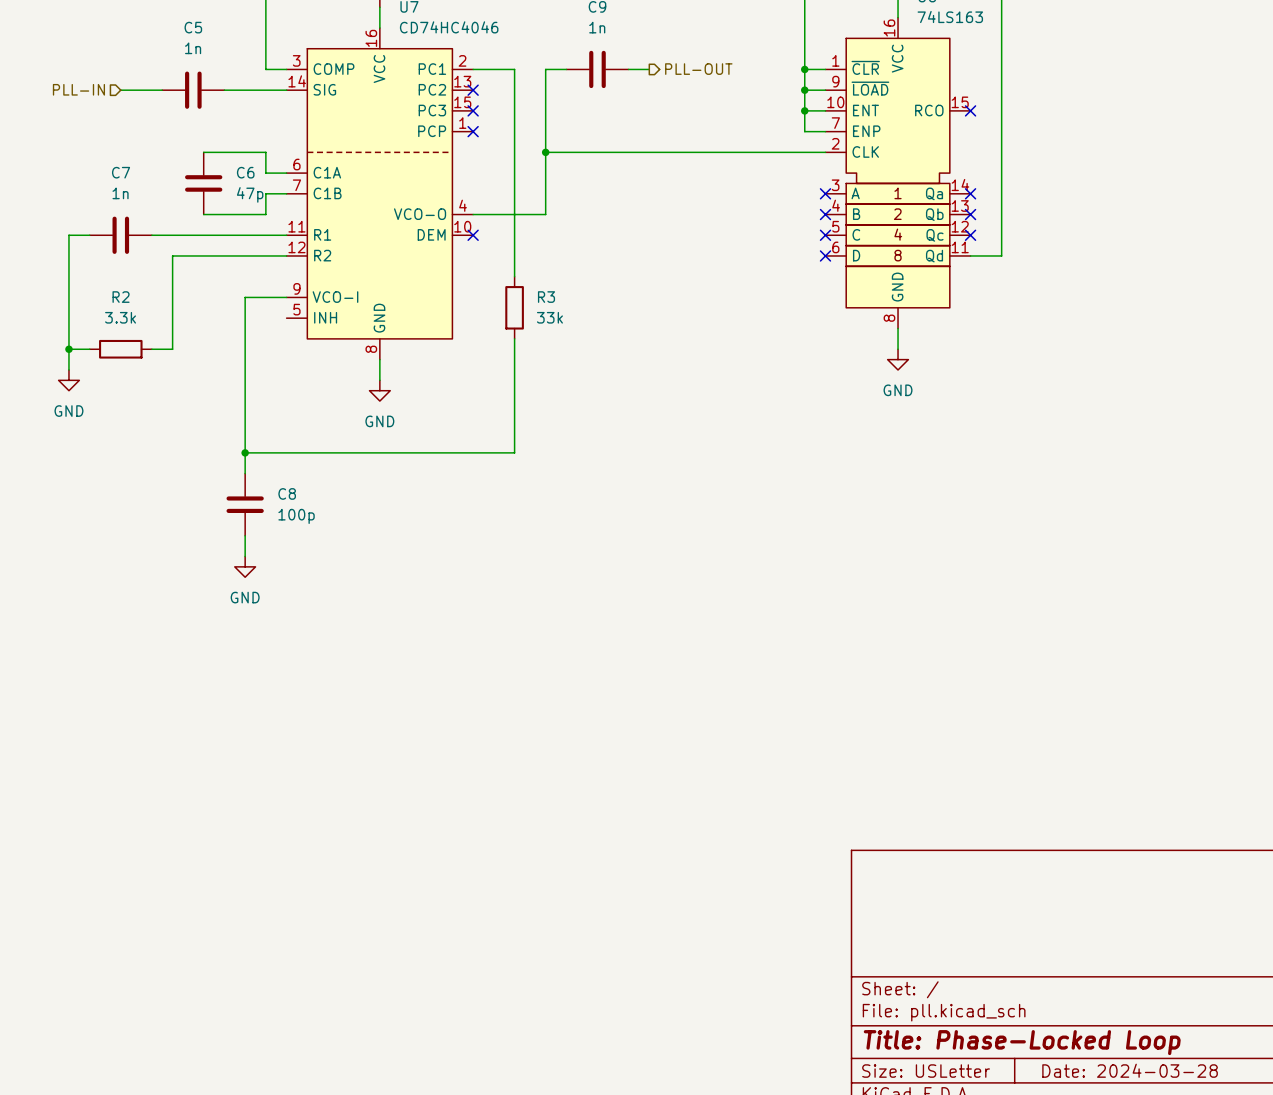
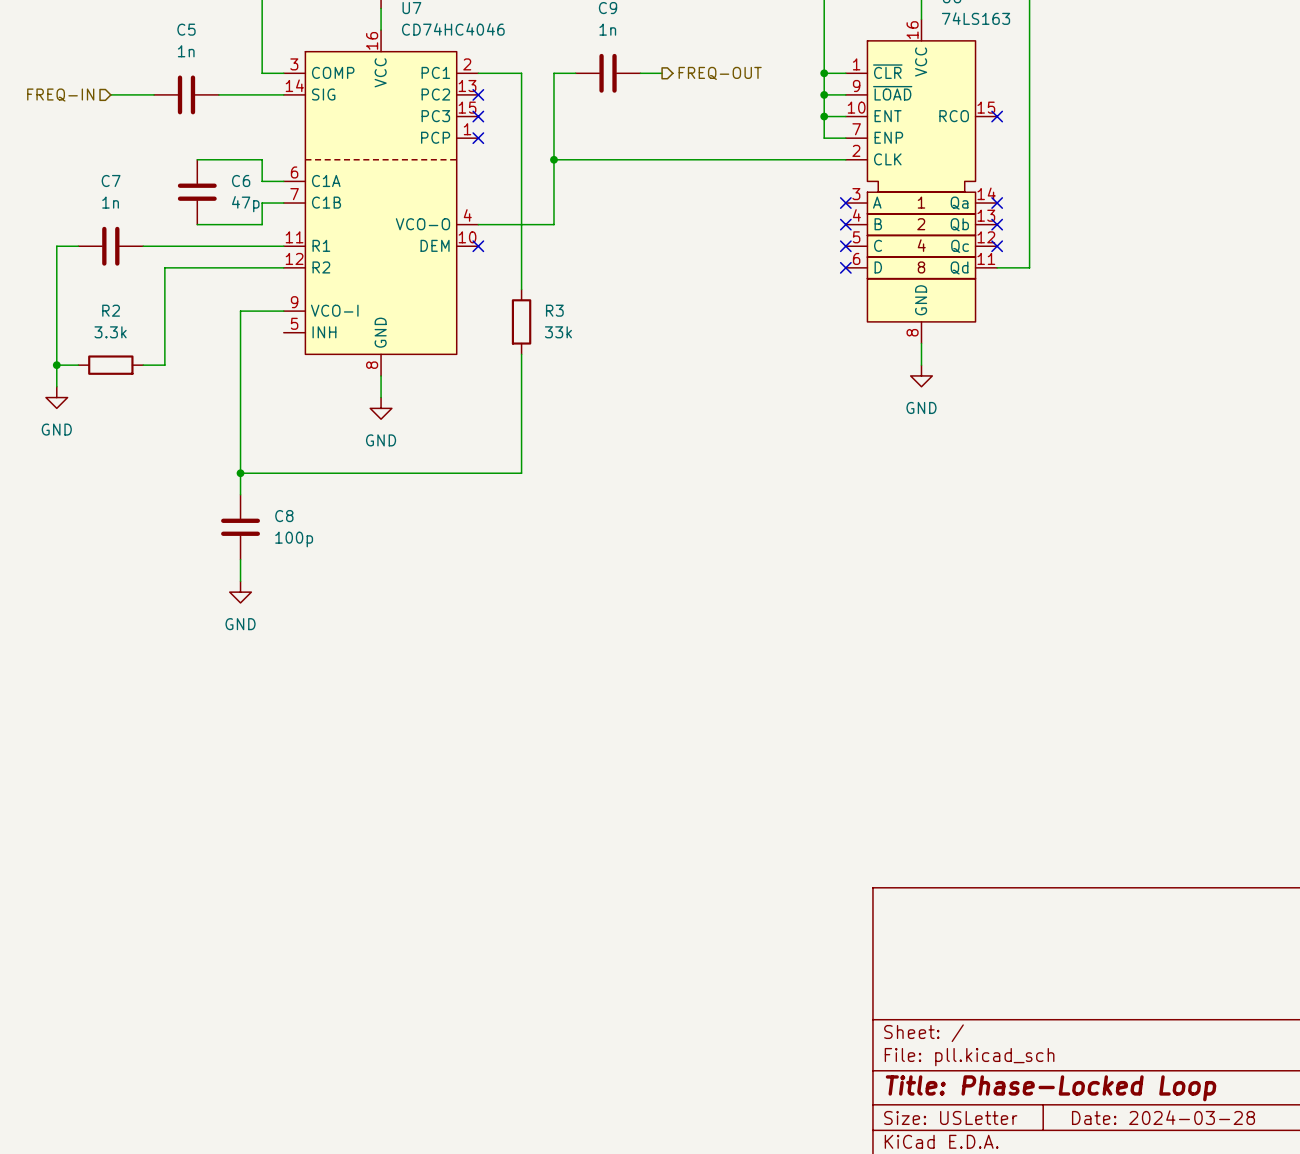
hierarchical label: PLL-OUT (698, 69) -> FREQ-OUT (720, 73)
hierarchical label: PLL-IN (78, 89) -> FREQ-IN (60, 95)

